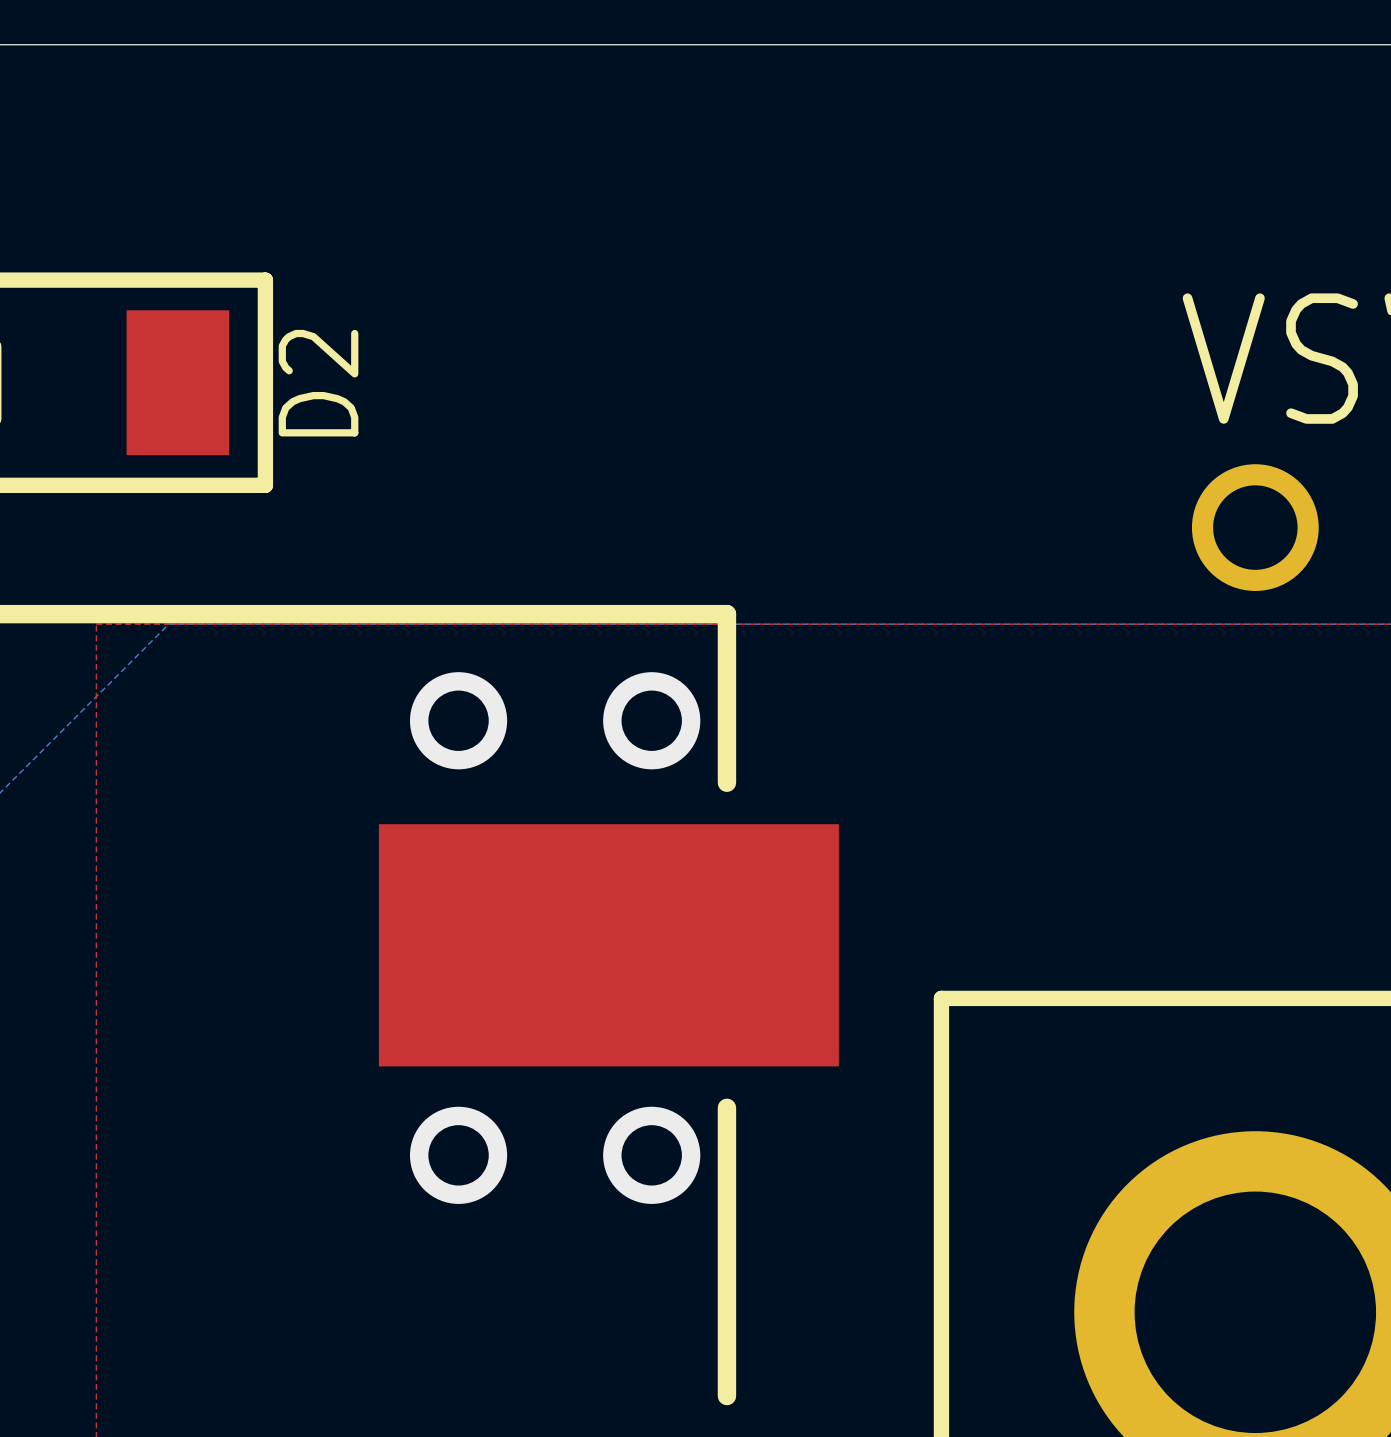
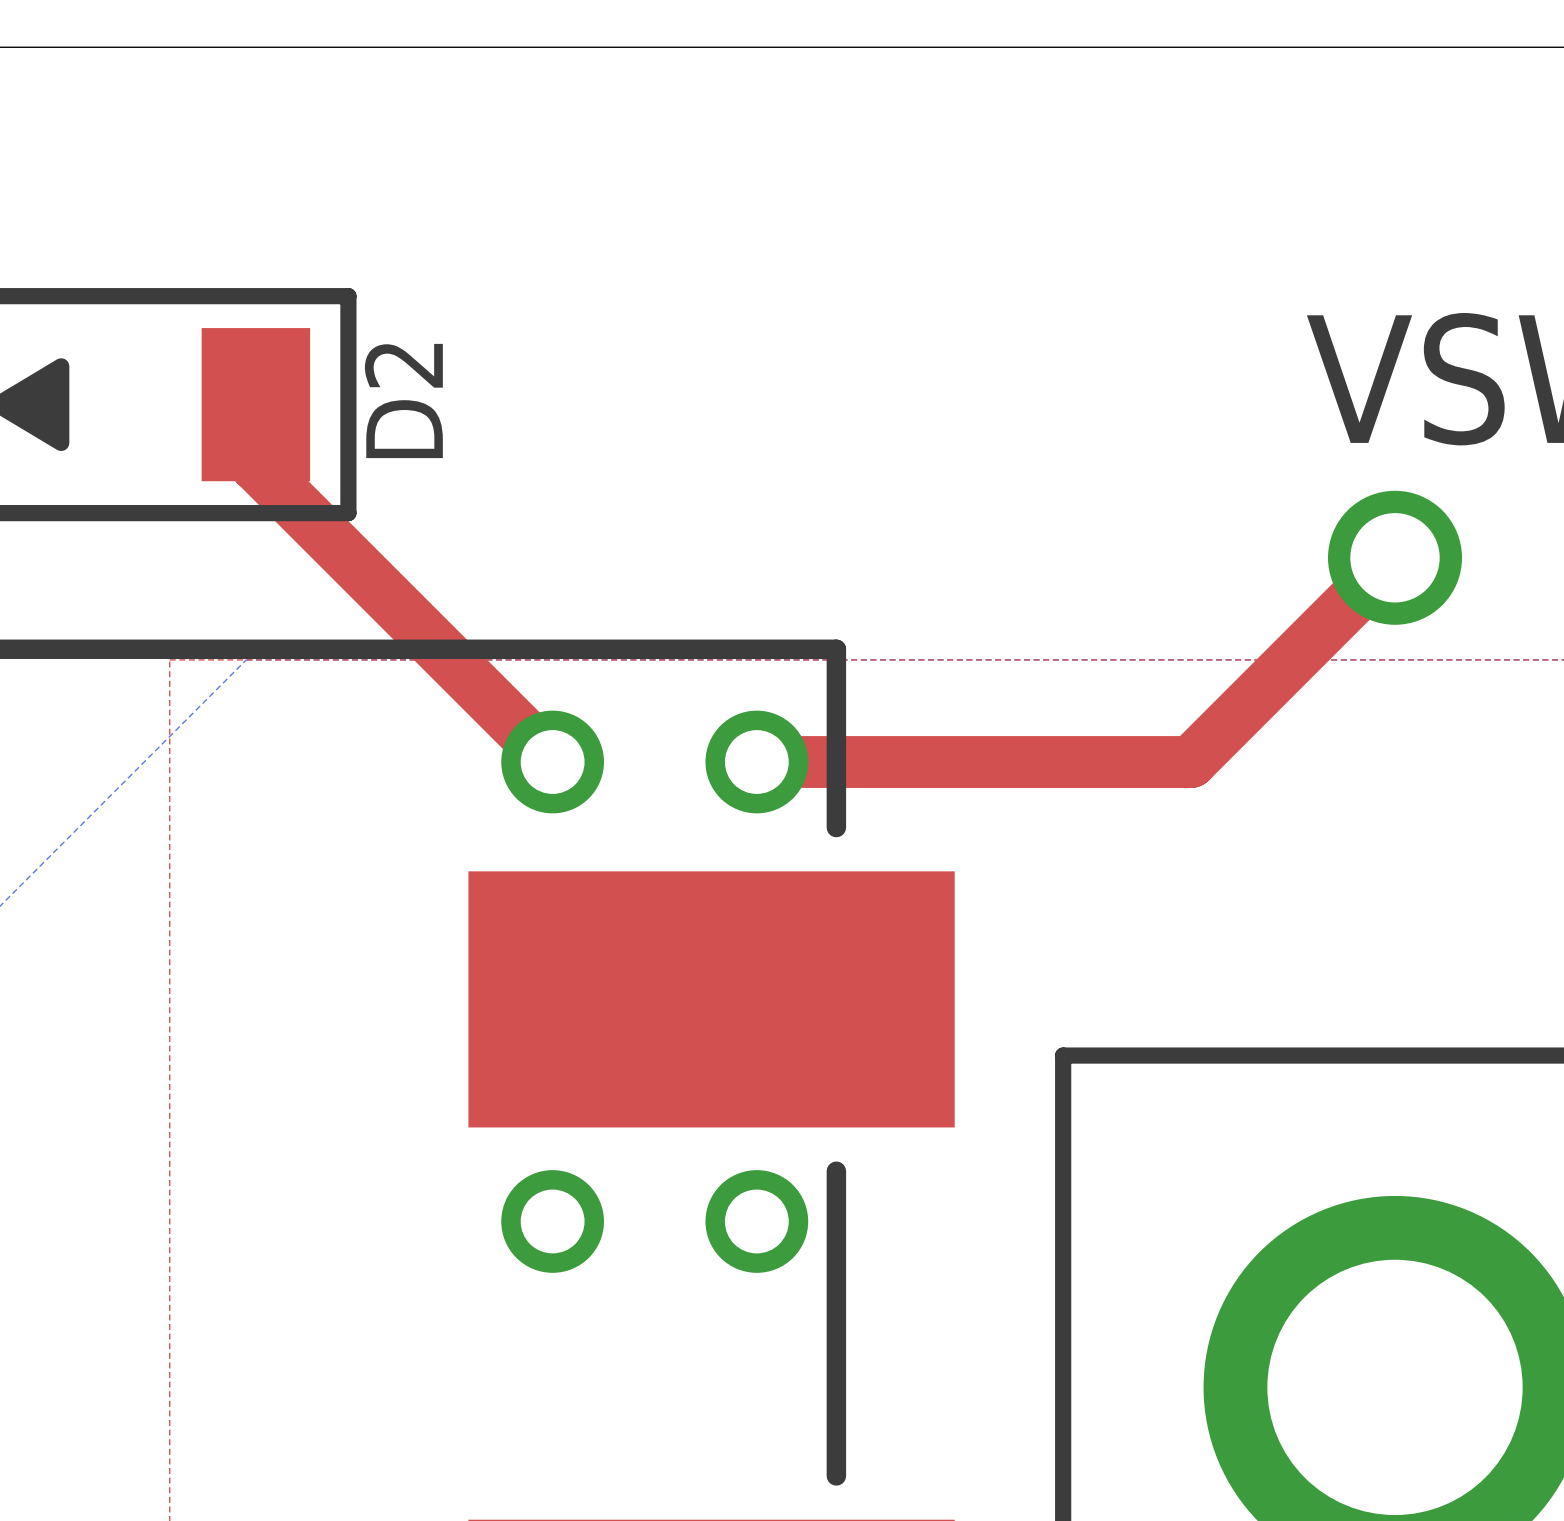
top track: none -> (255, 404) (255, 465) (552, 762)
top track: none -> (1395, 557) (1190, 762) (756, 762)

